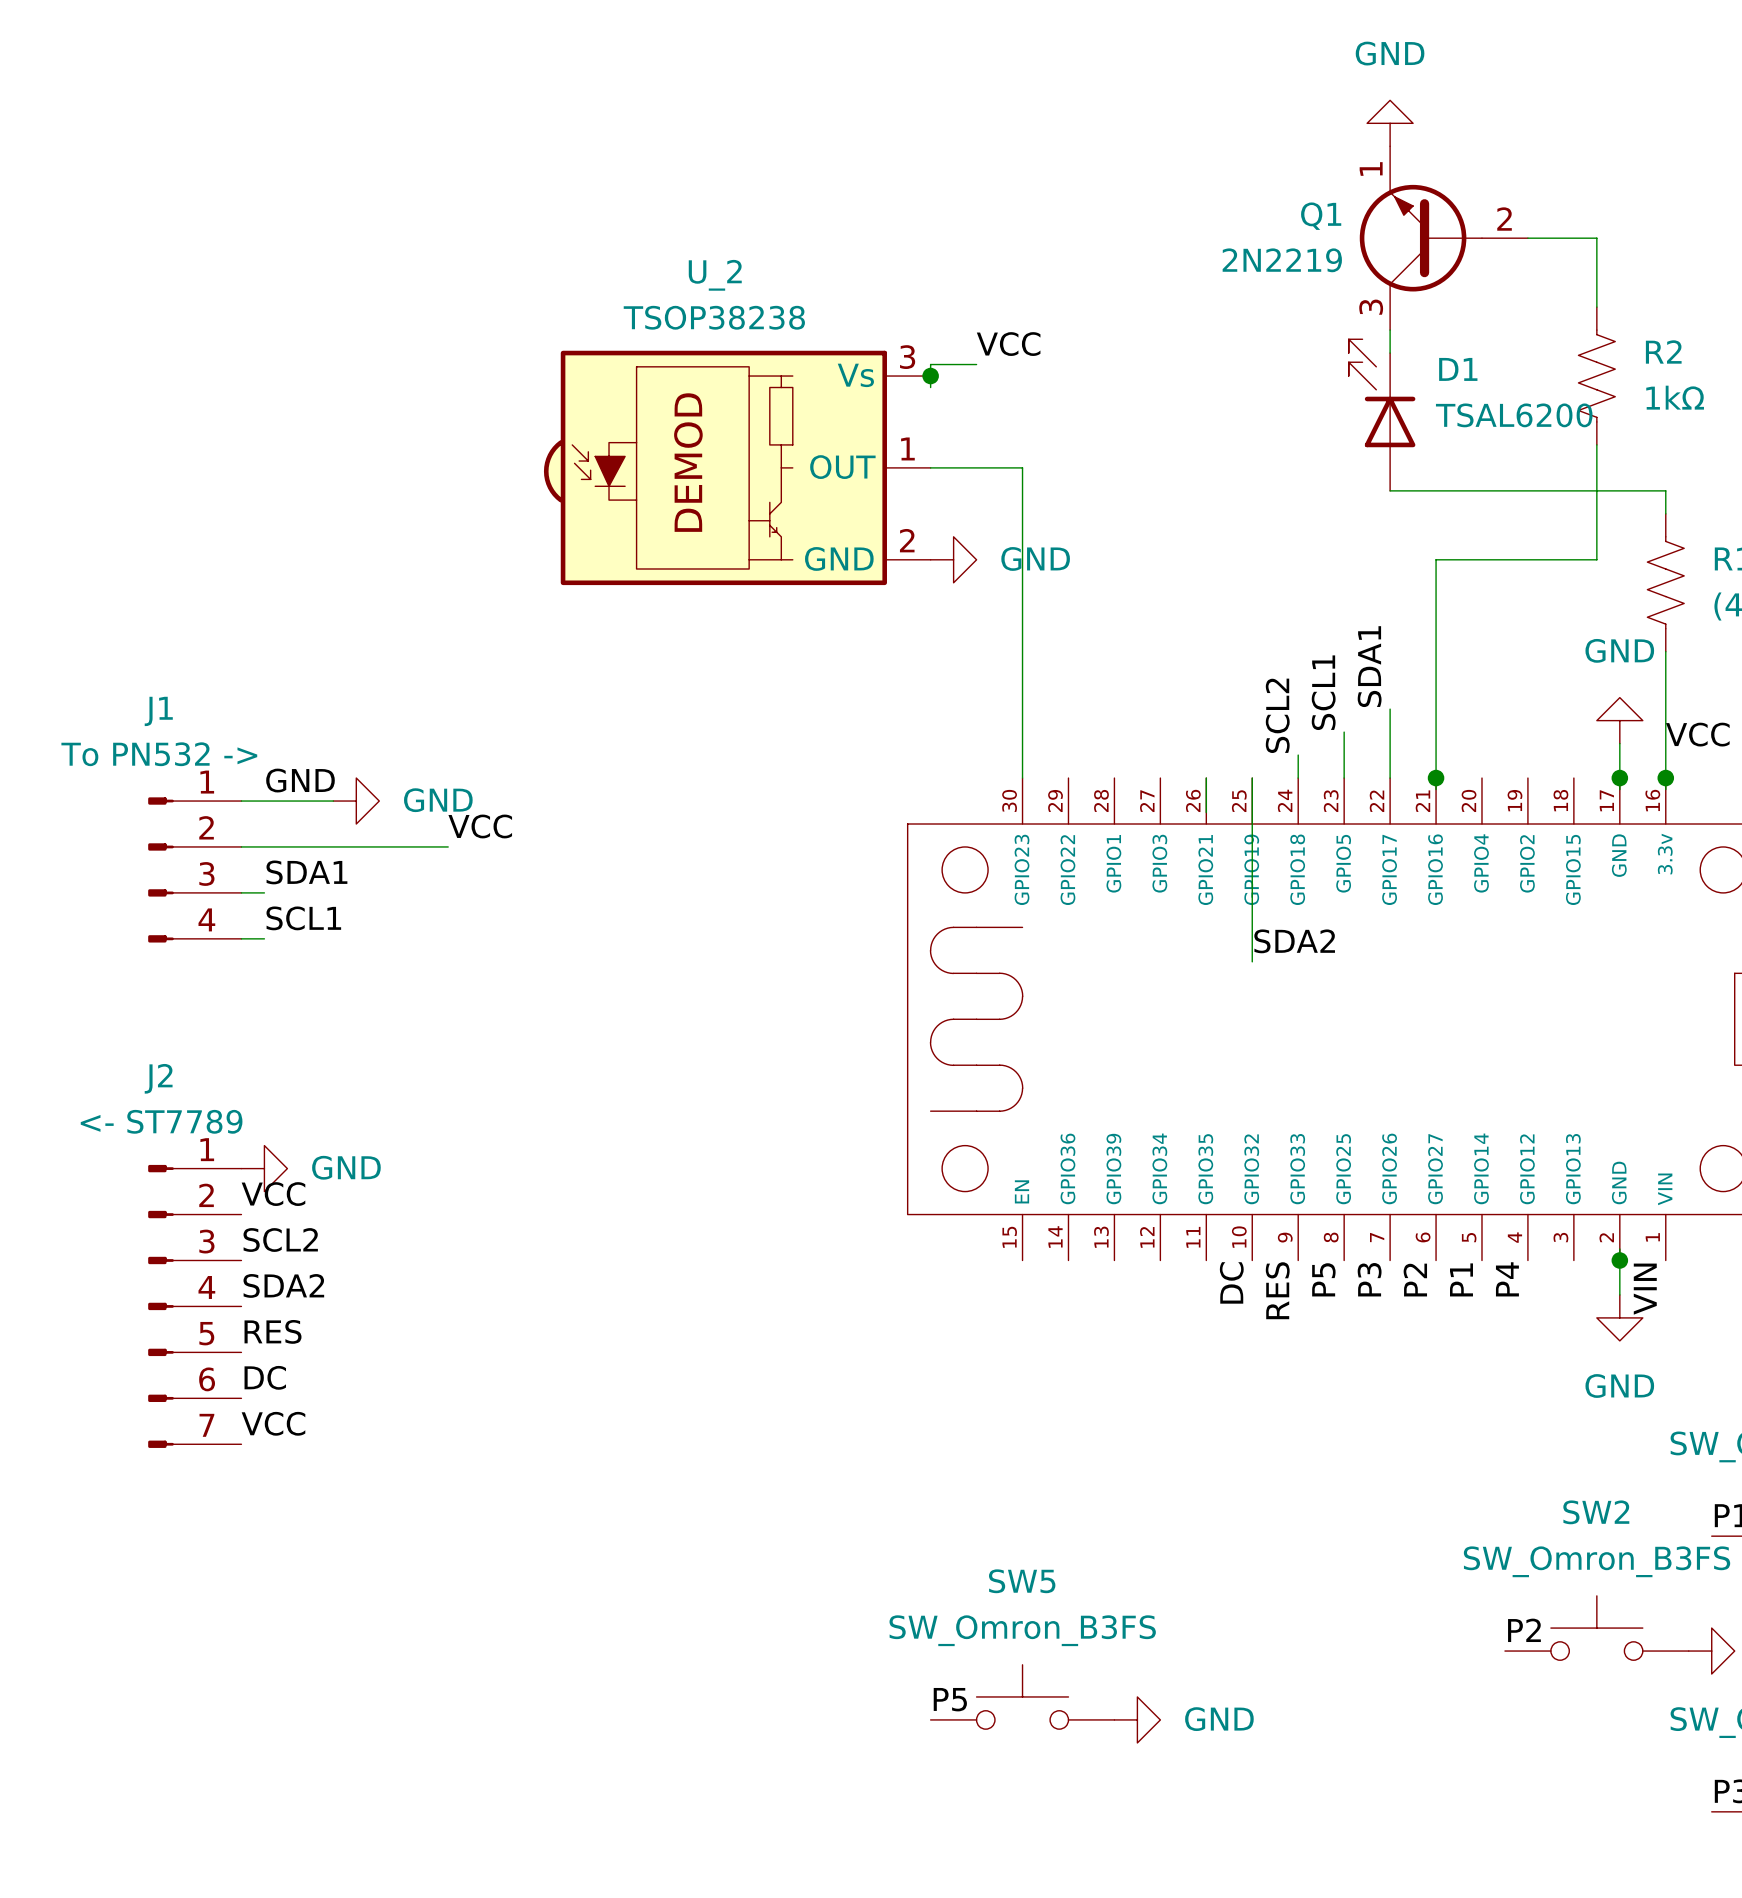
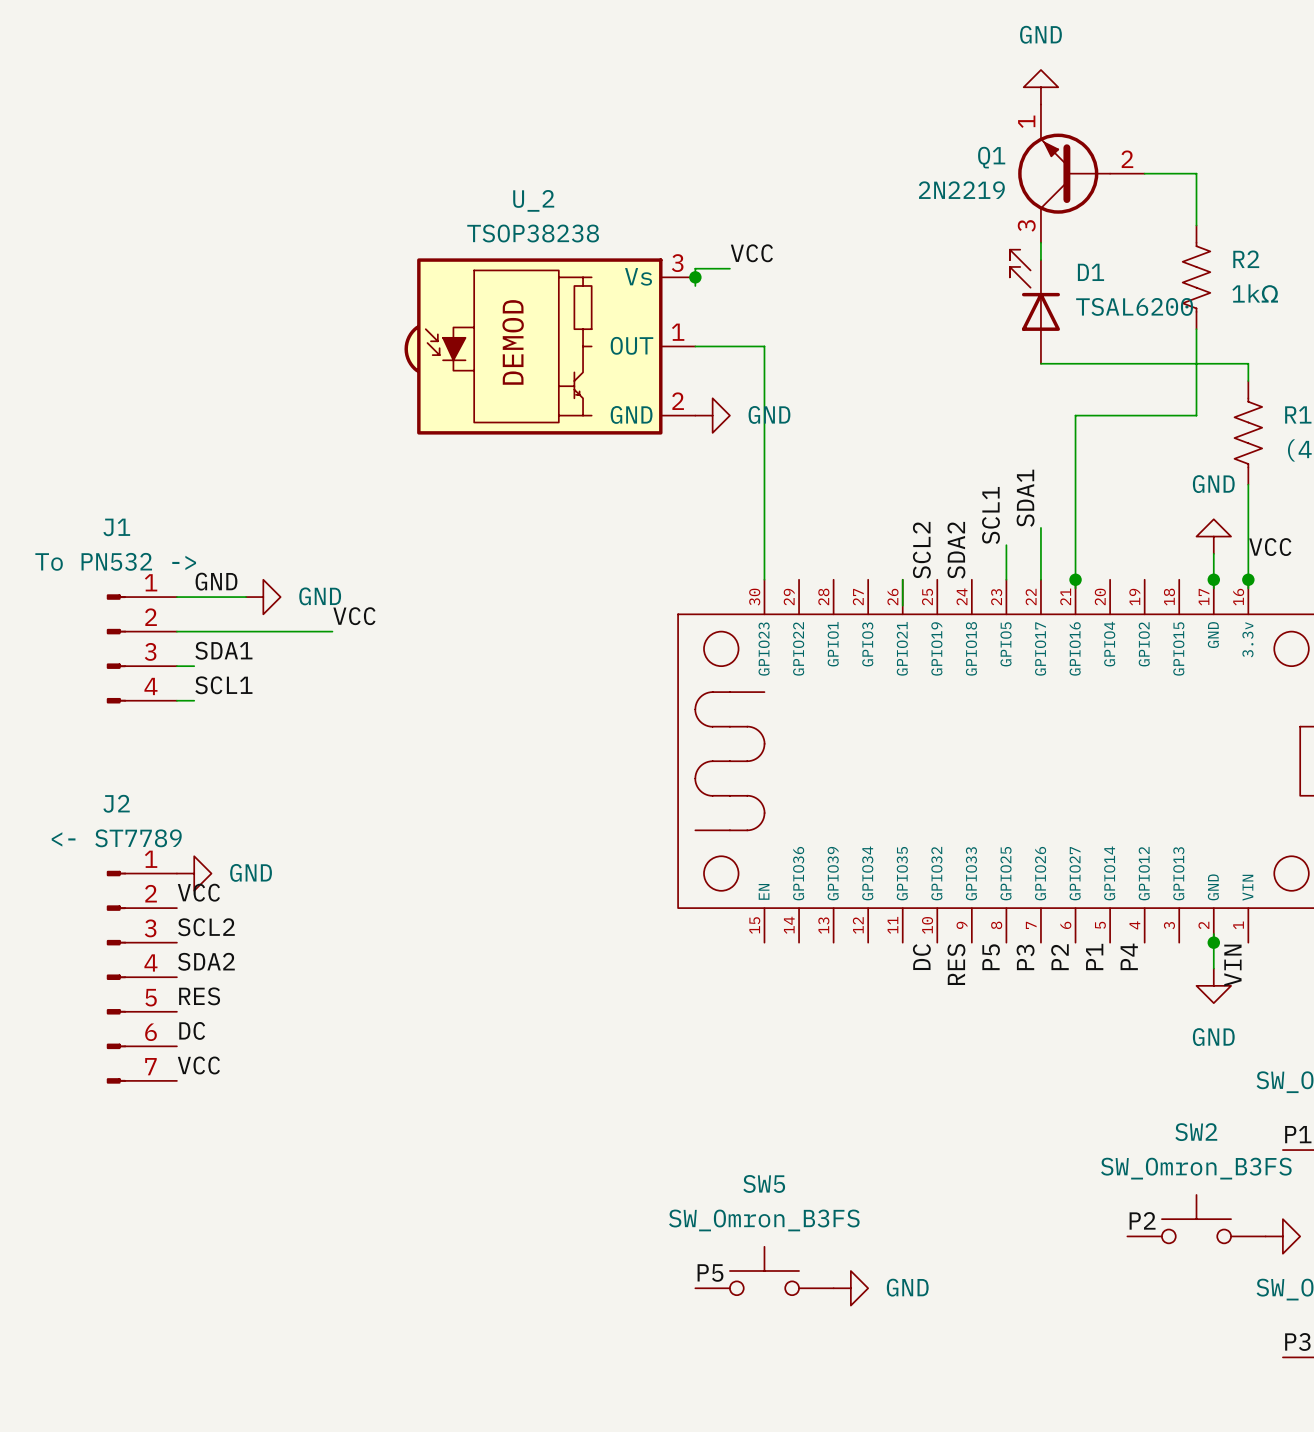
label position: SCL2 (1277, 715) -> SCL2 (921, 550)
wire: (1298, 755) (1298, 778) -> none
wire: (1252, 778) (1252, 961) -> none
label rotation: 0° (1294, 941) -> 90° counterclockwise (956, 550)
label position: SDA2 (1294, 941) -> SDA2 (956, 550)

